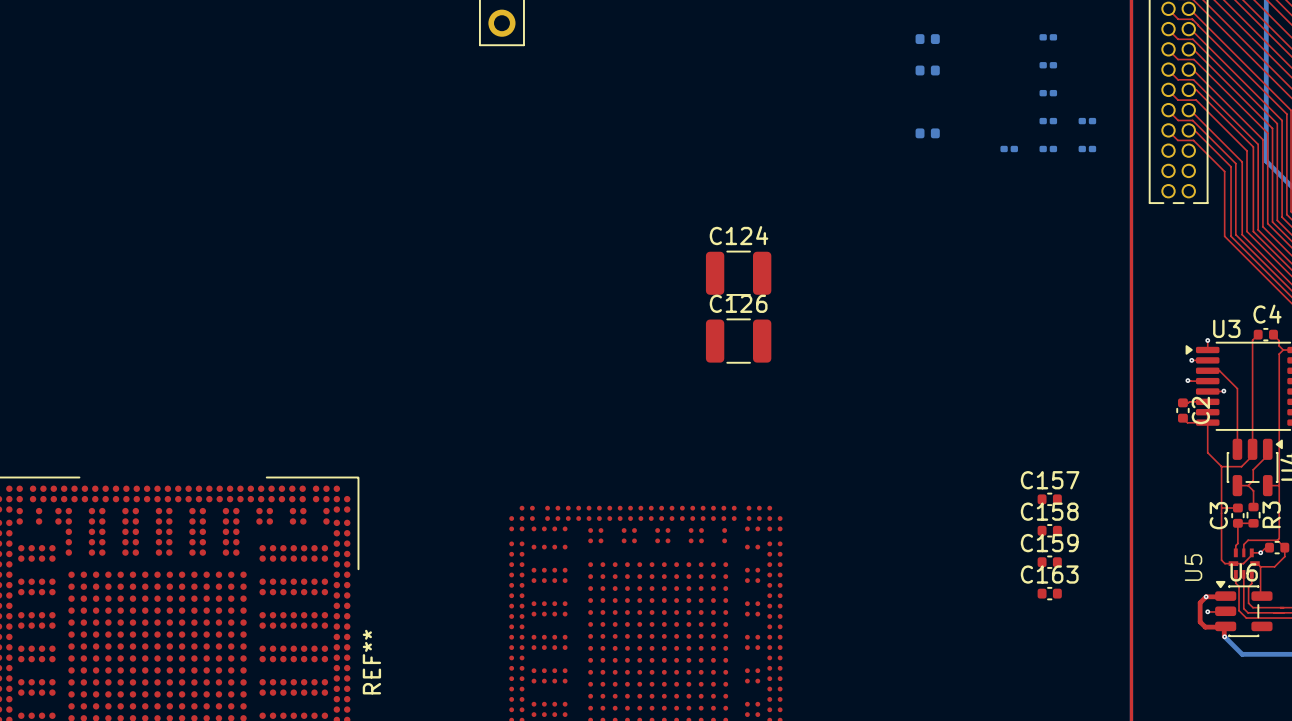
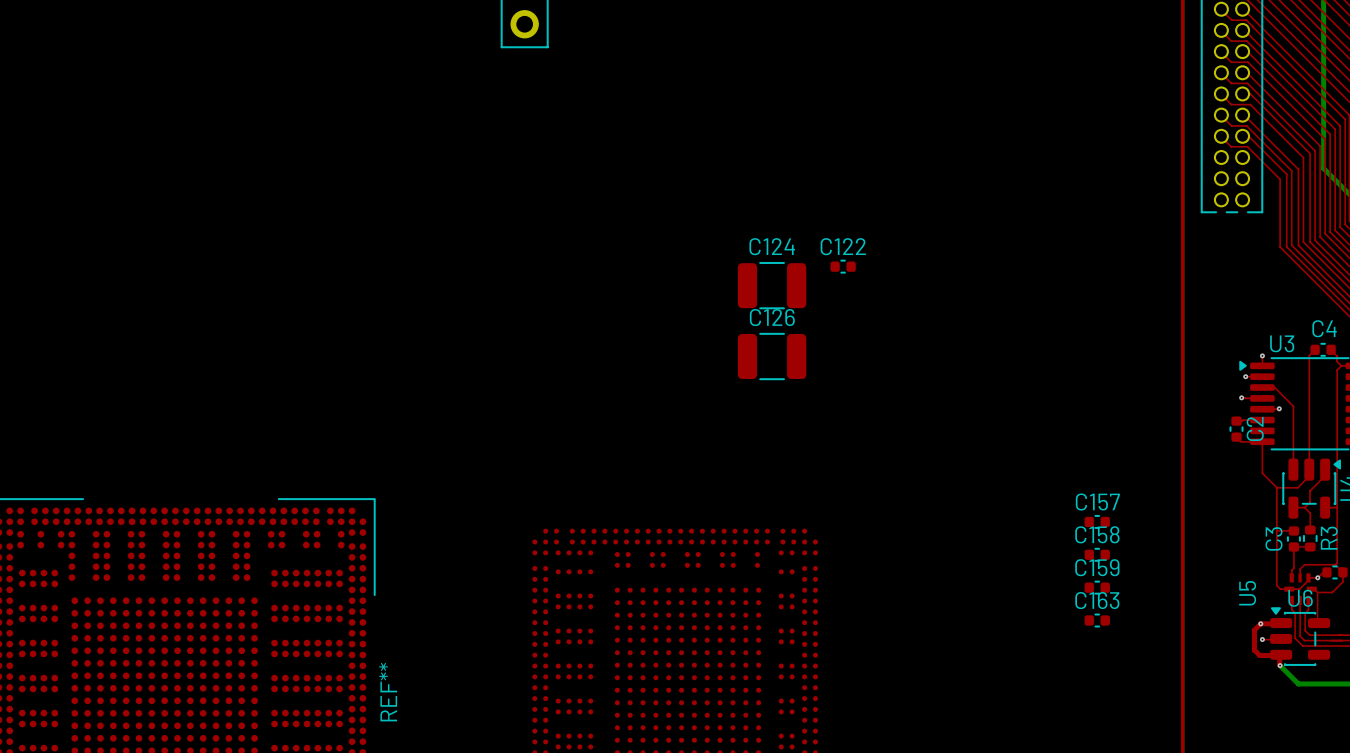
part: (1048, 37) -> none
part: (927, 39) -> none
part: (1048, 65) -> none
part: (927, 70) -> none
part: (1048, 93) -> none
part: (1048, 121) -> none
part: (1087, 121) -> none
part: (927, 133) -> none
part: (1009, 148) -> none
part: (1048, 148) -> none
part: (1087, 148) -> none
C122: none -> (843, 266)

